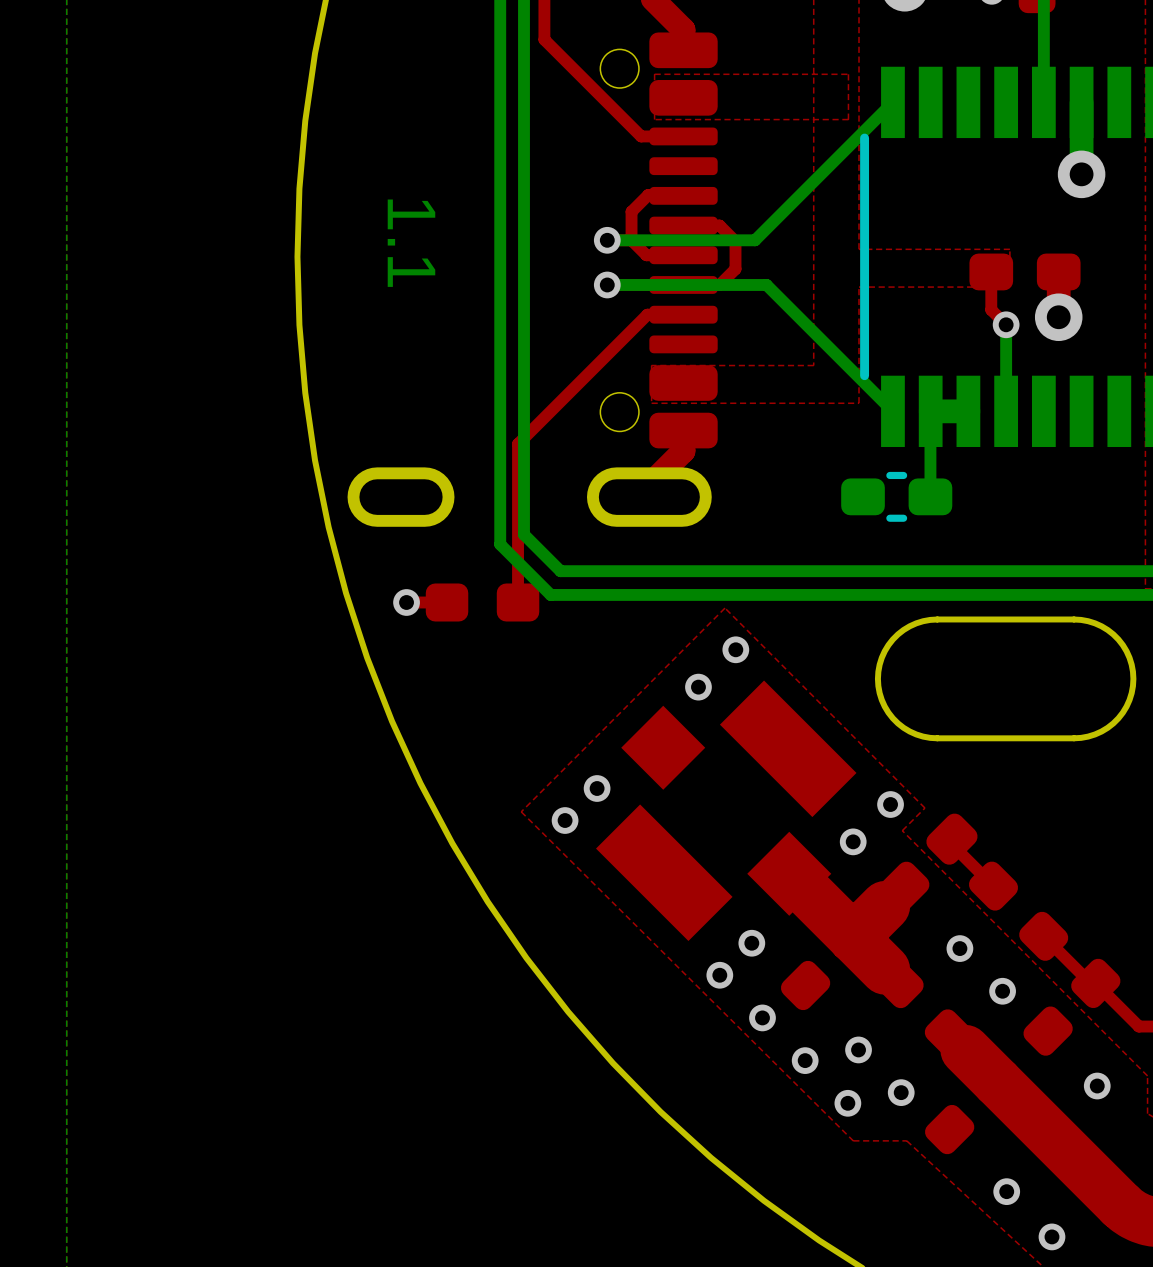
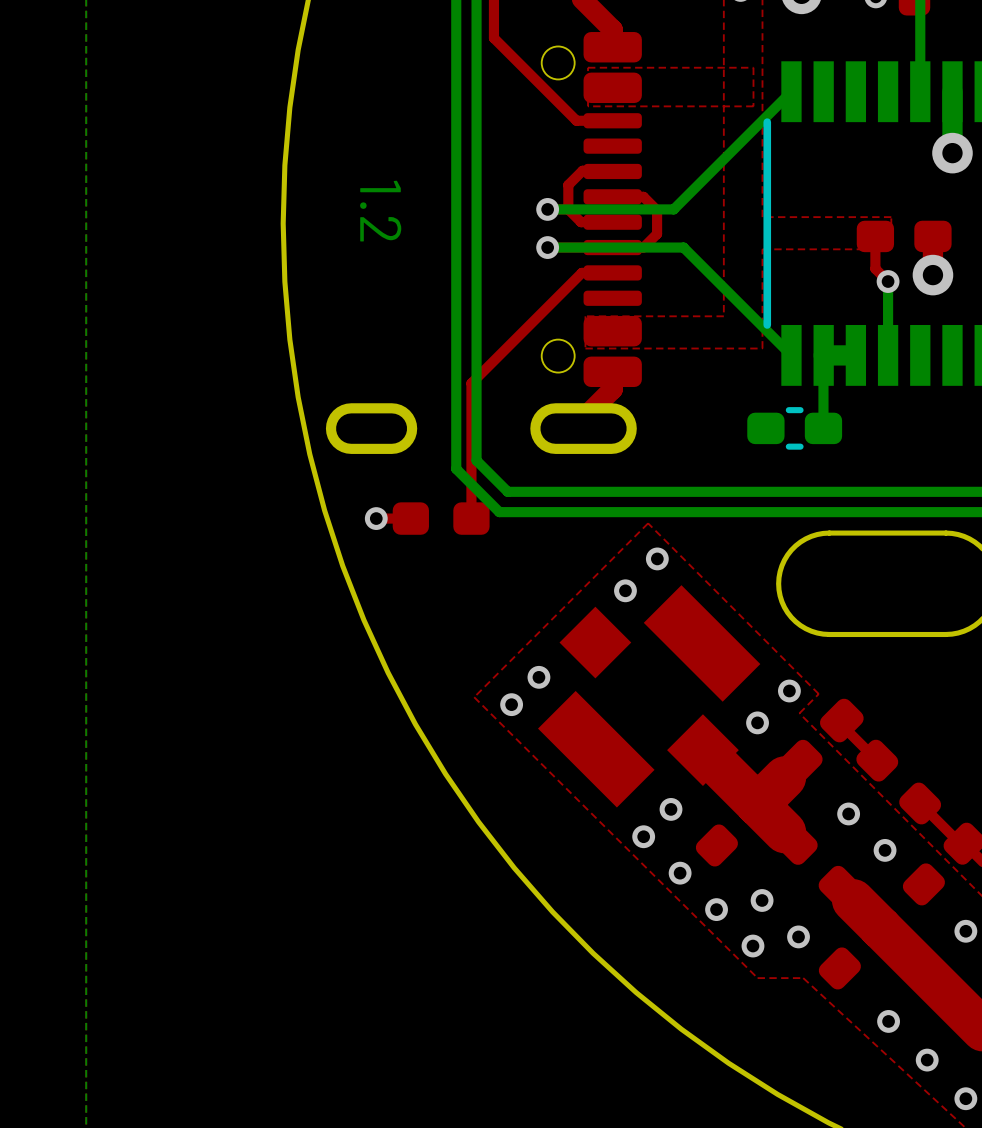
text: 1.1 (411, 243) -> 1.2 (380, 211)

